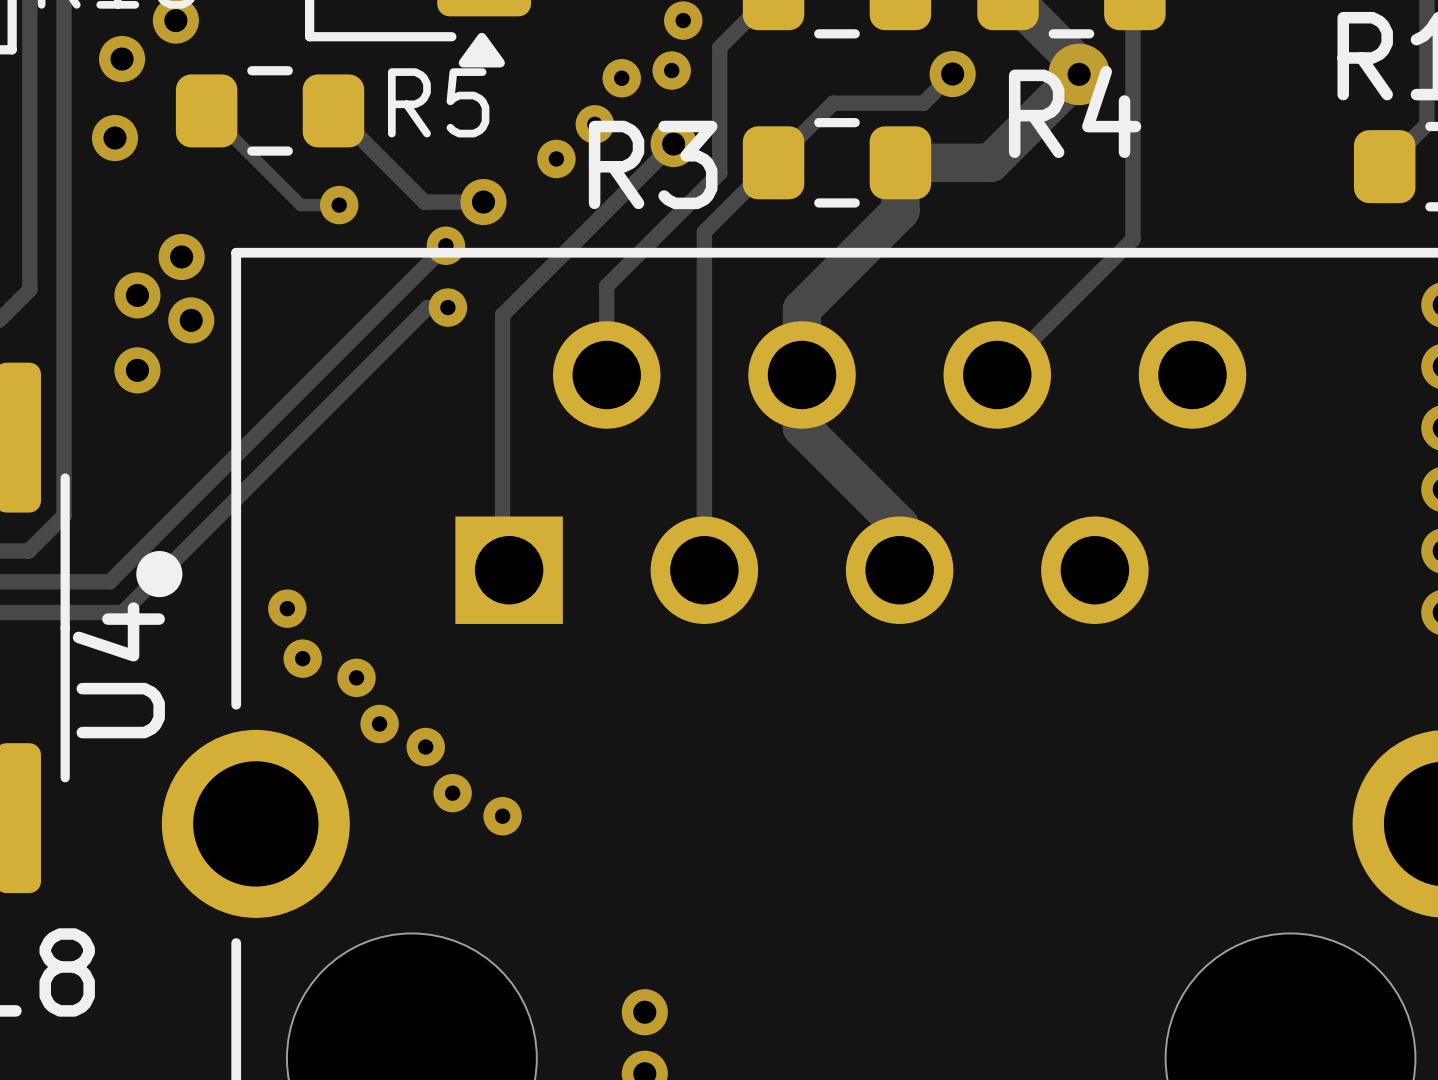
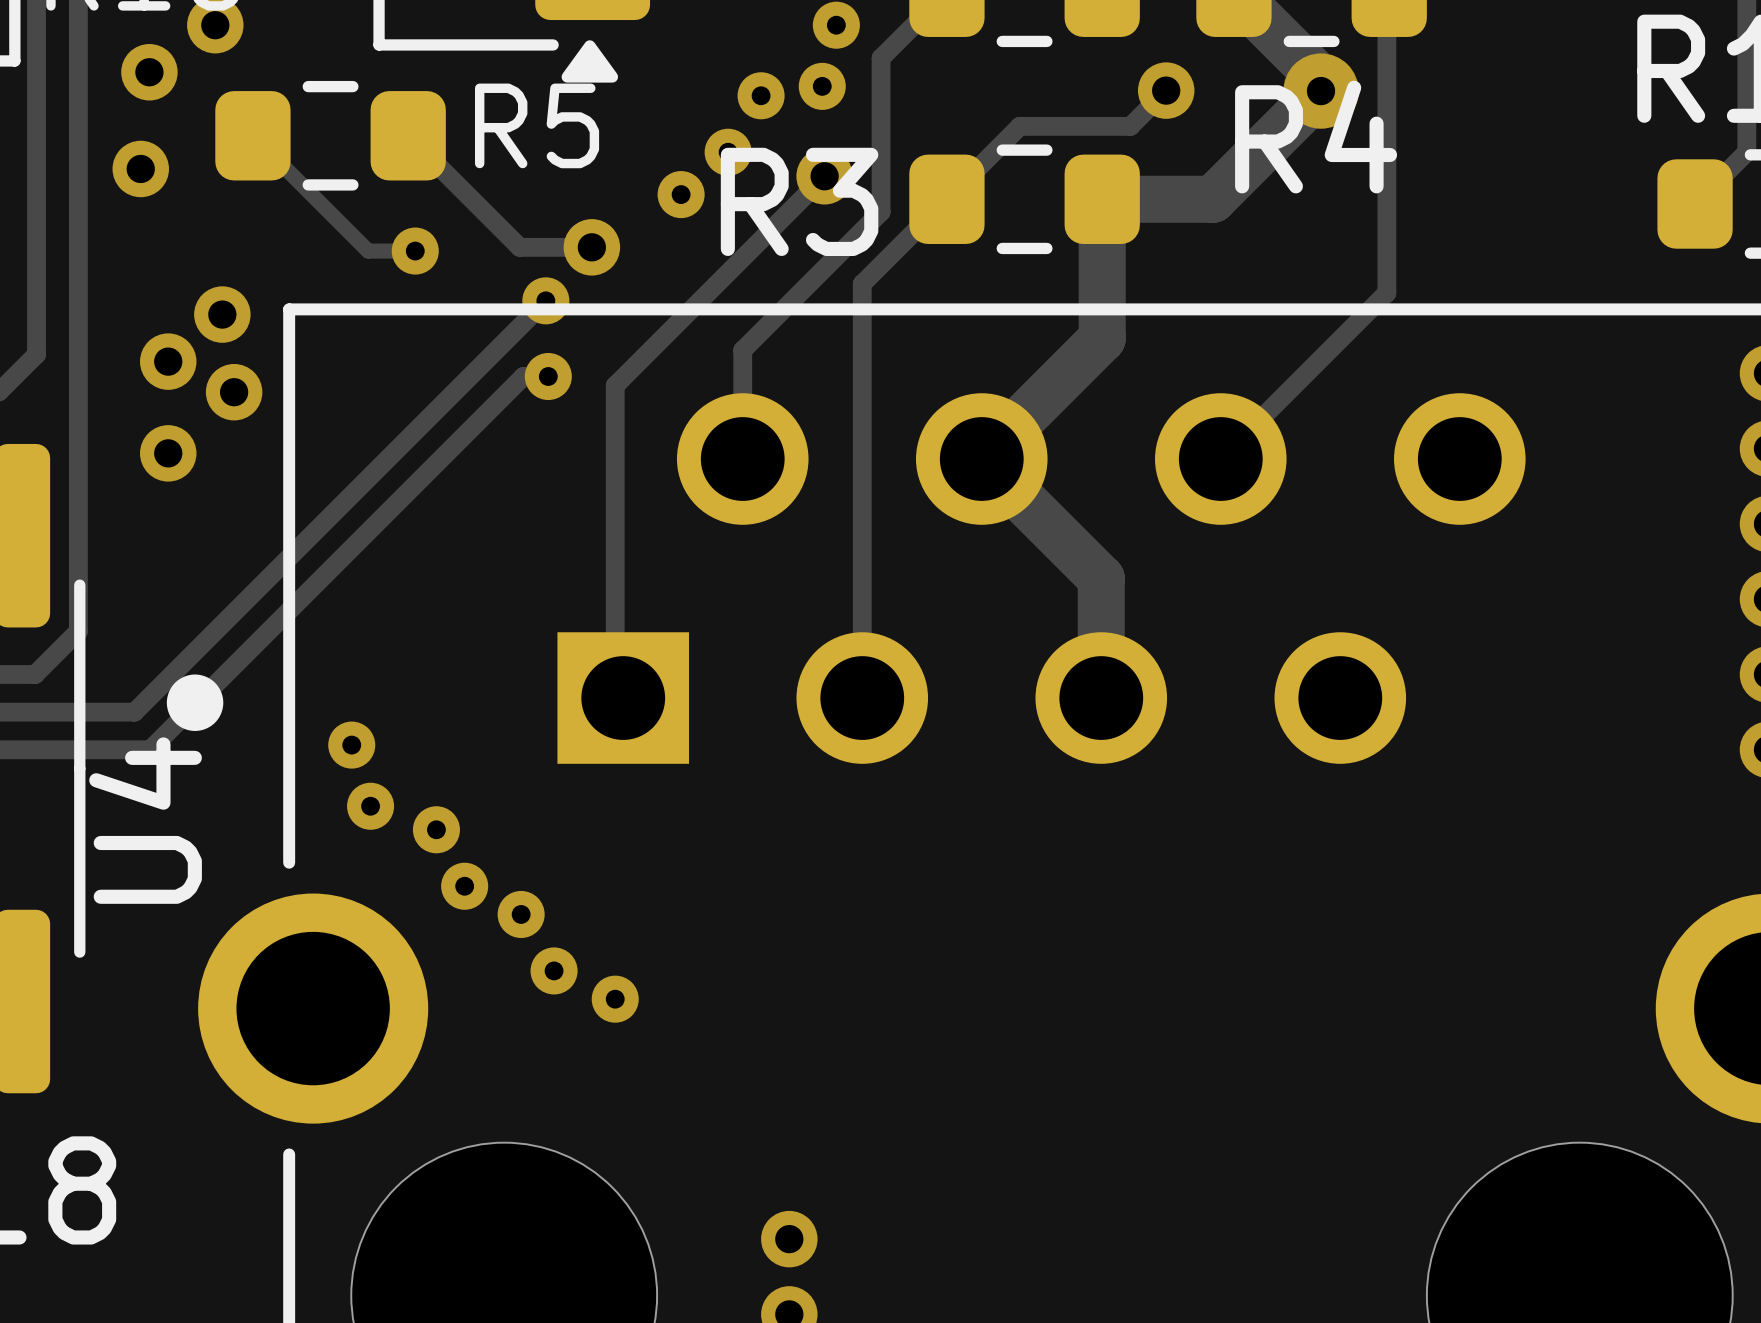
track: (900, 210) (802, 309) (802, 427) (899, 525) -> (1102, 258) (1102, 338) (981, 459) (1101, 578) (1101, 642)

